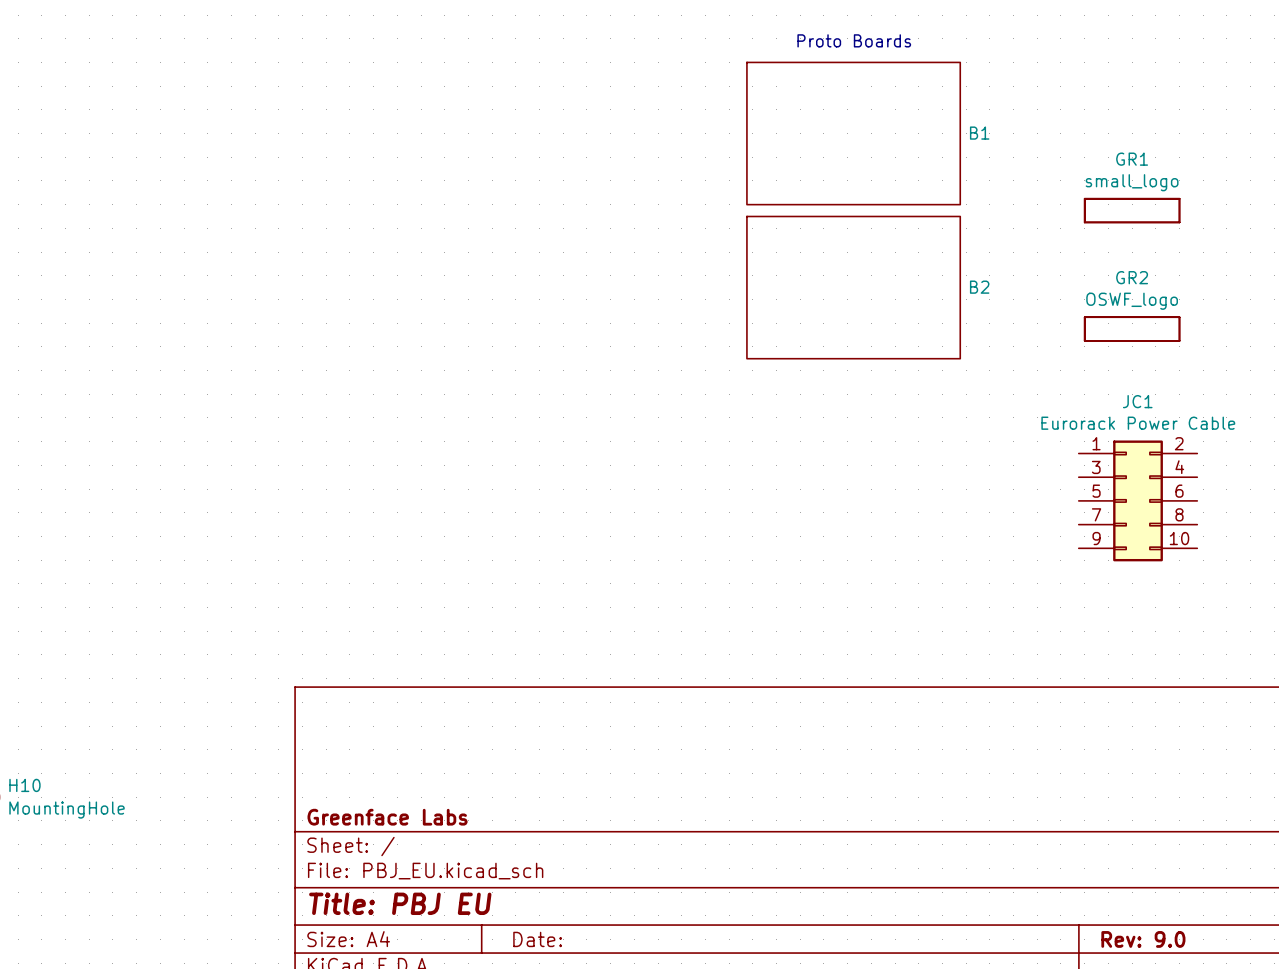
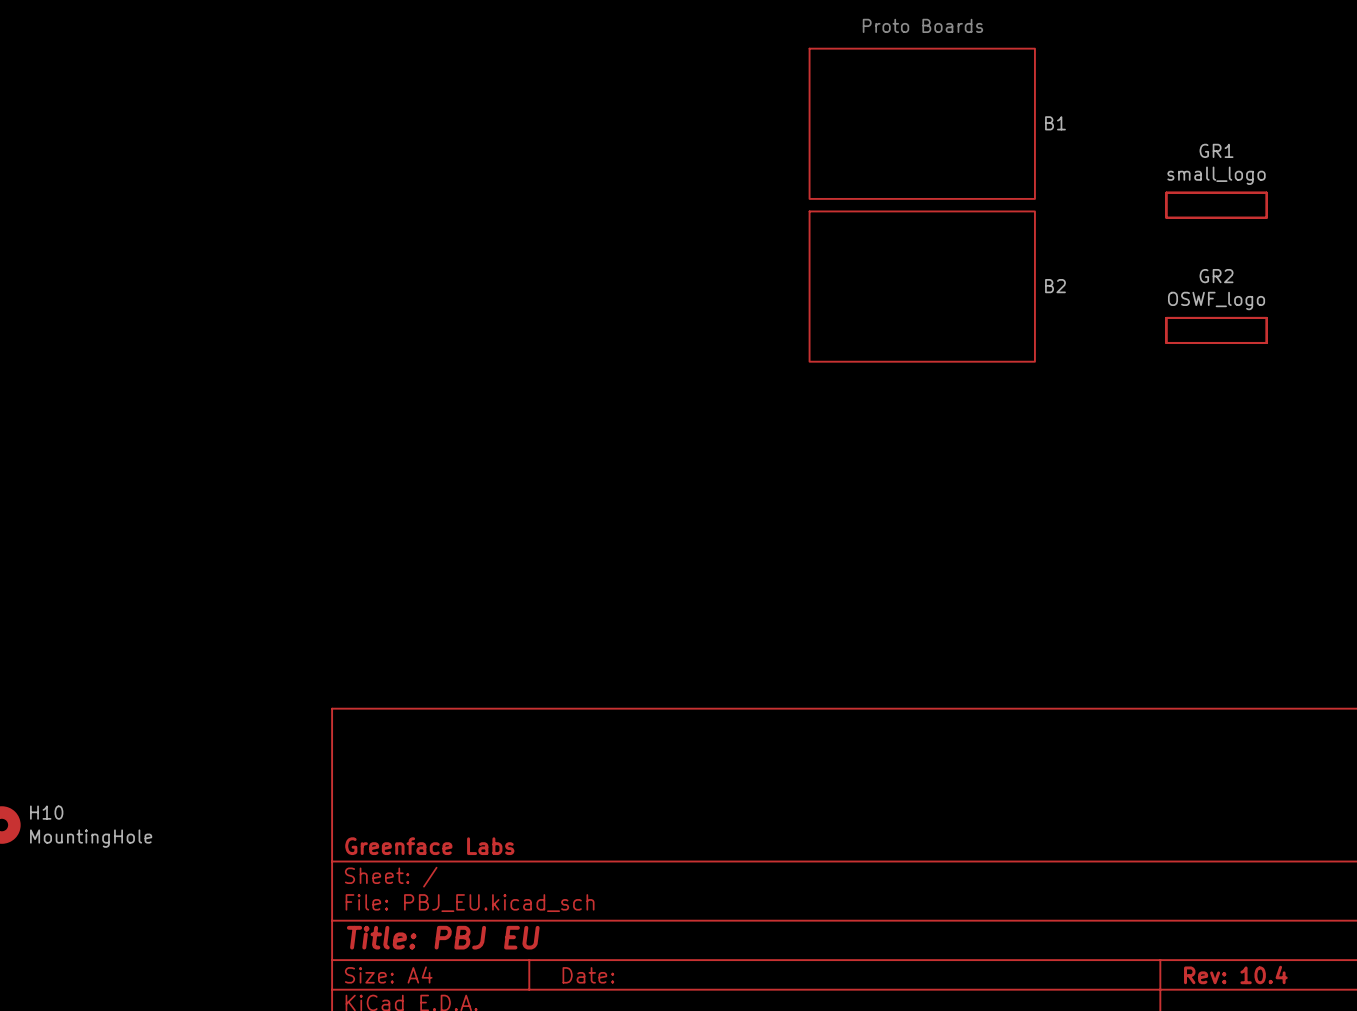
JC1: Eurorack Power Cable (1138, 500) -> none
title block: Rev: 9.0 (1143, 939) -> Rev: 10.4 (1235, 974)

